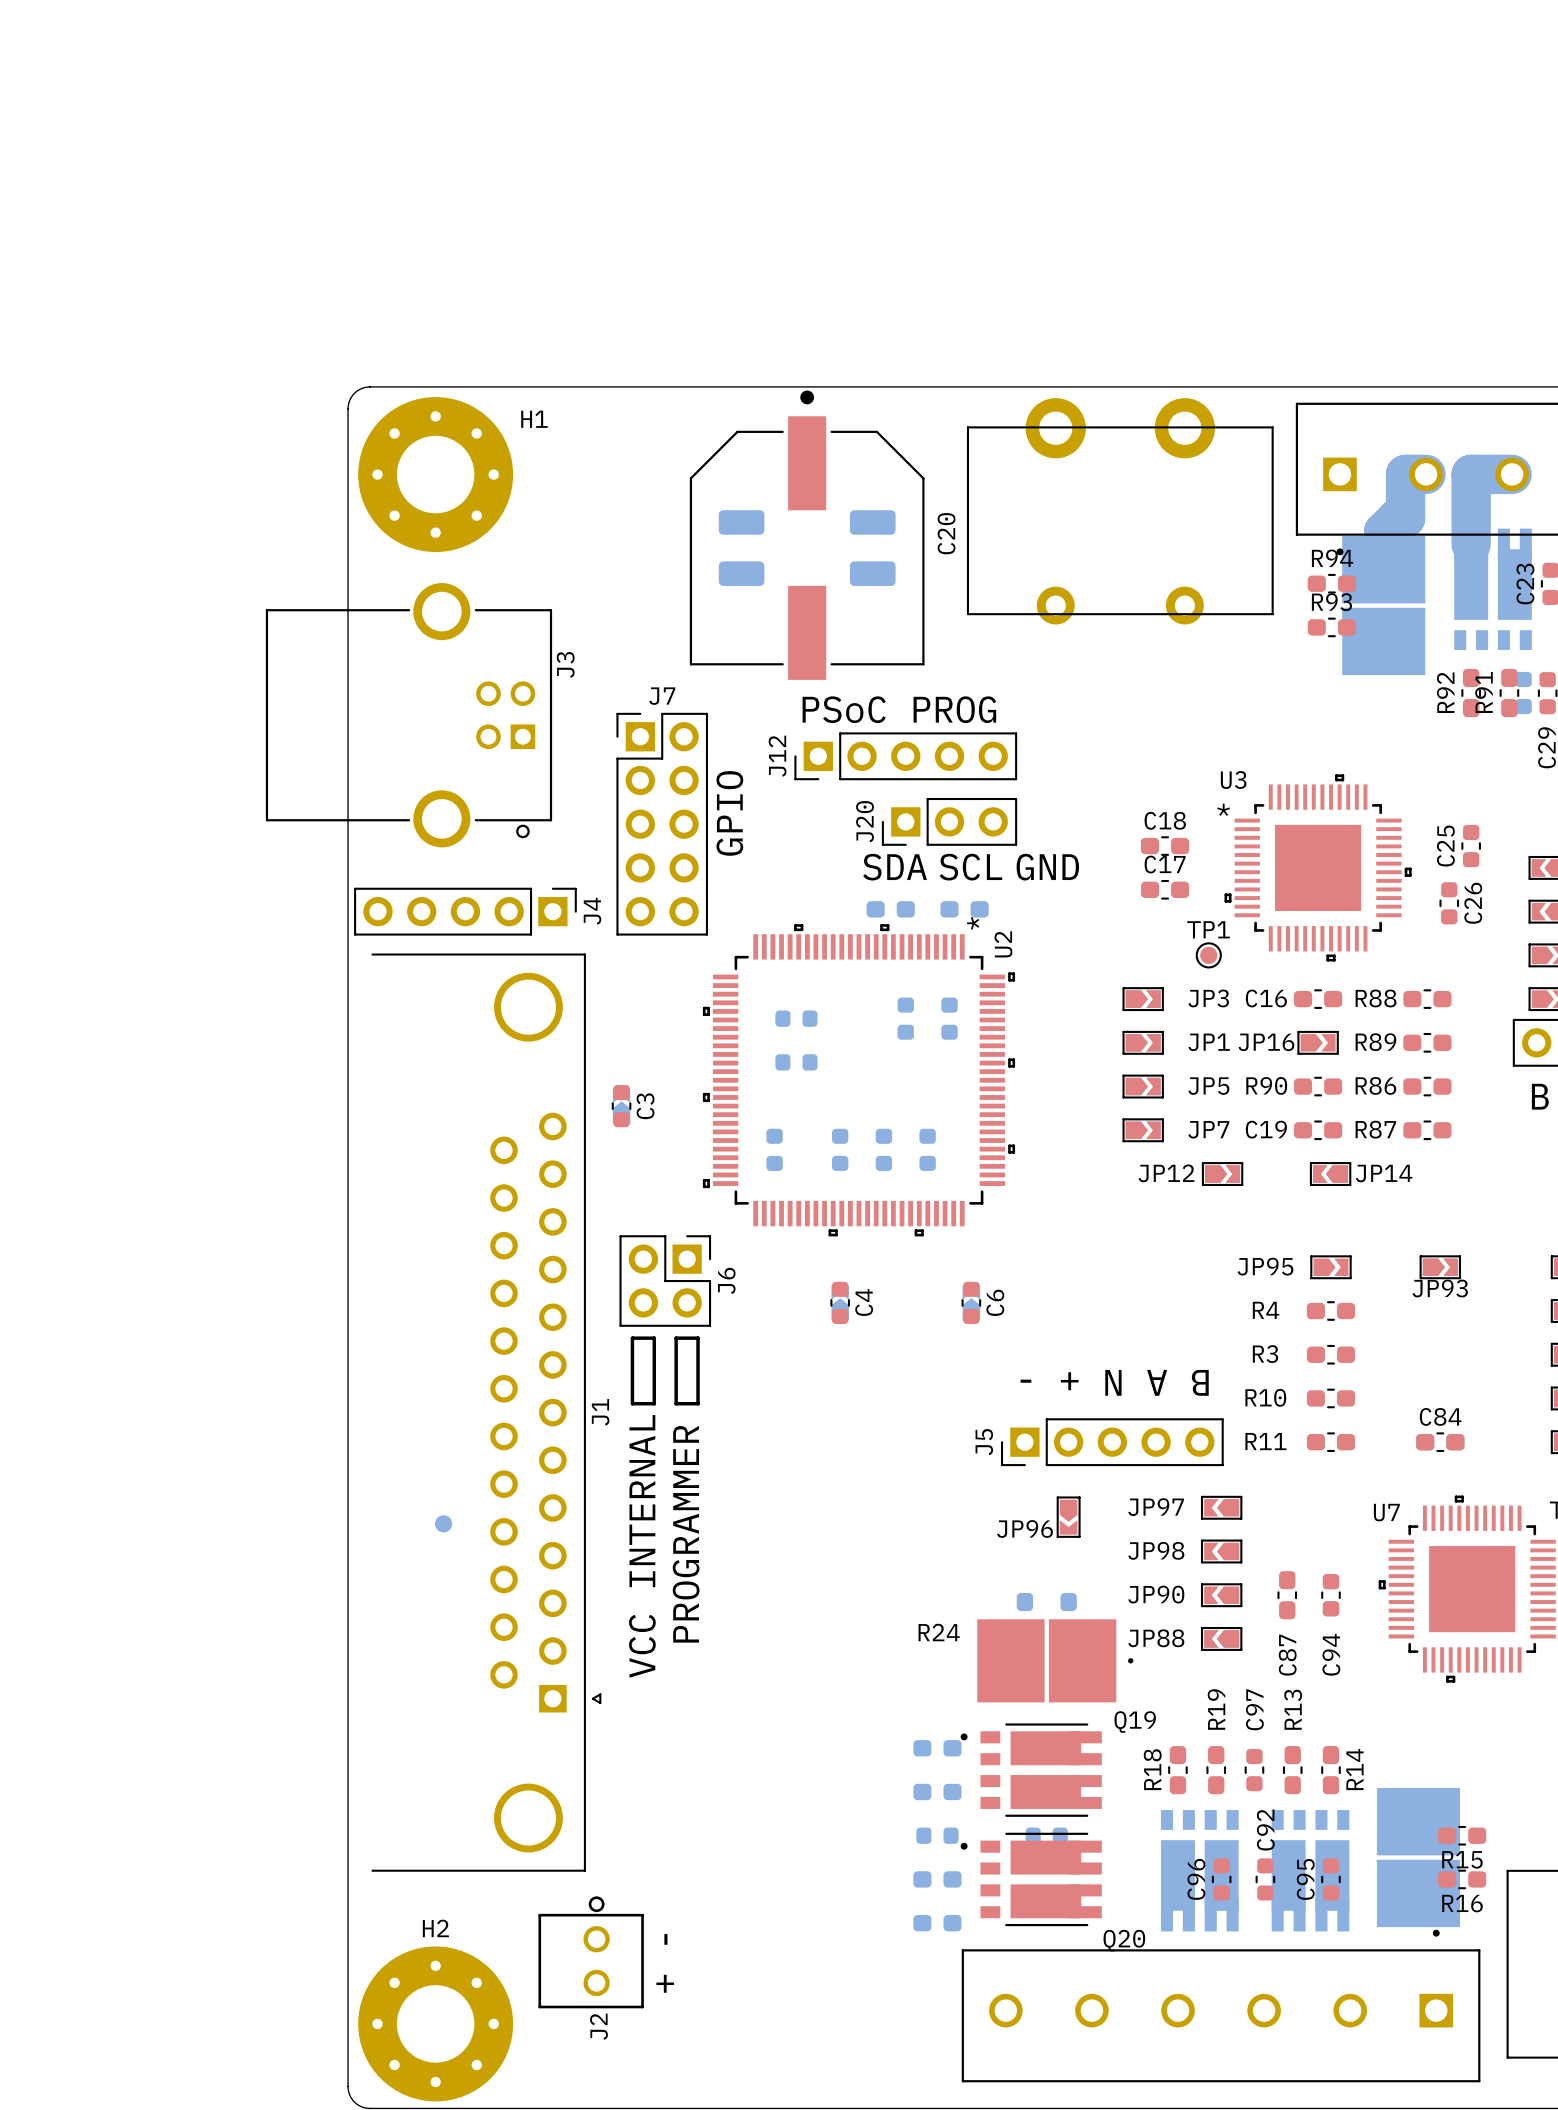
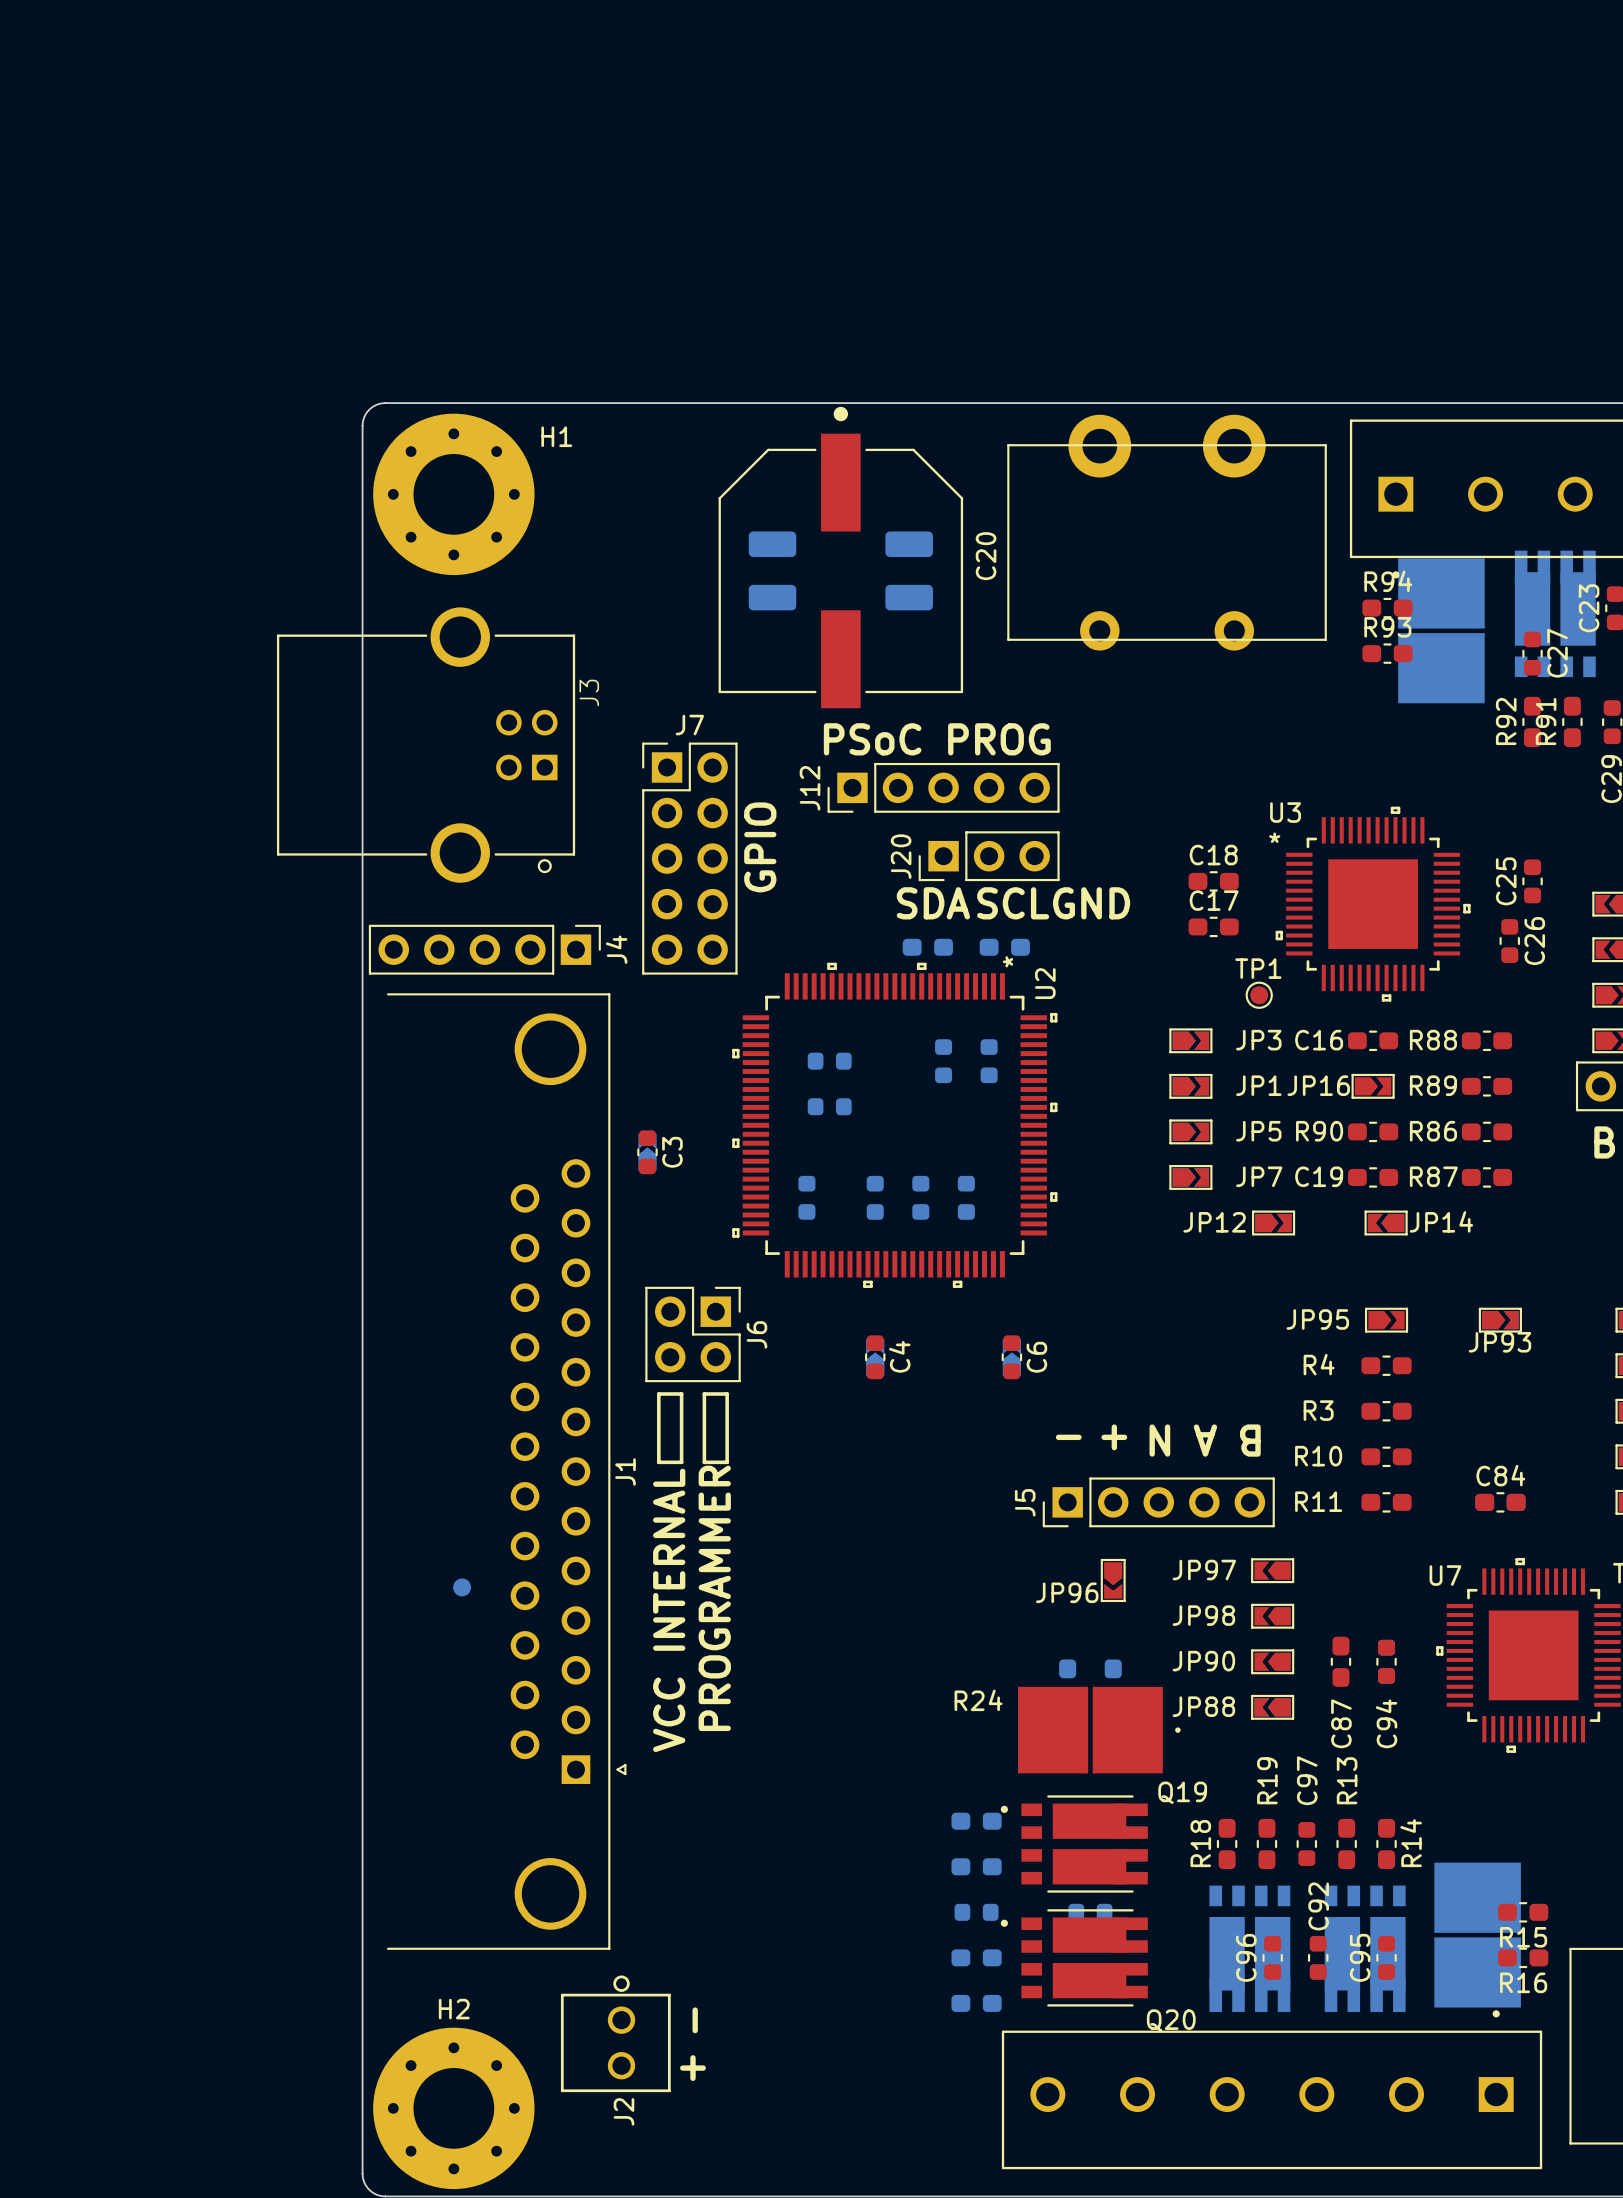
bottom track: (1426, 474) (1405, 474) (1405, 518) (1397, 518) (1383, 531) (1383, 568) -> none
bottom track: (1512, 474) (1471, 474) (1471, 544) (1460, 544) (1460, 555) (1477, 572) (1482, 572) (1482, 544) -> none
C27 side: bottom (1523, 693) -> top (1532, 653)

